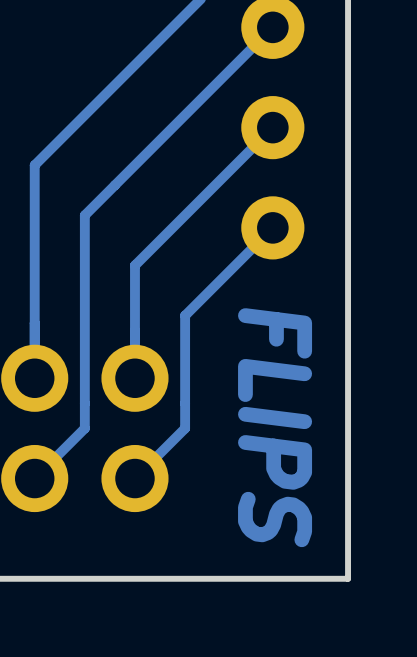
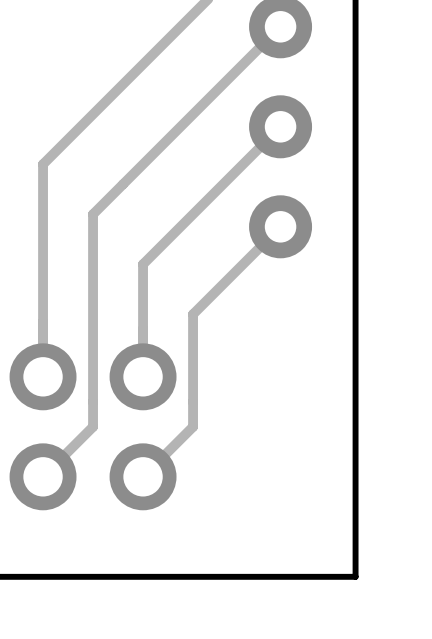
text: FLIPS (275, 427) -> none

